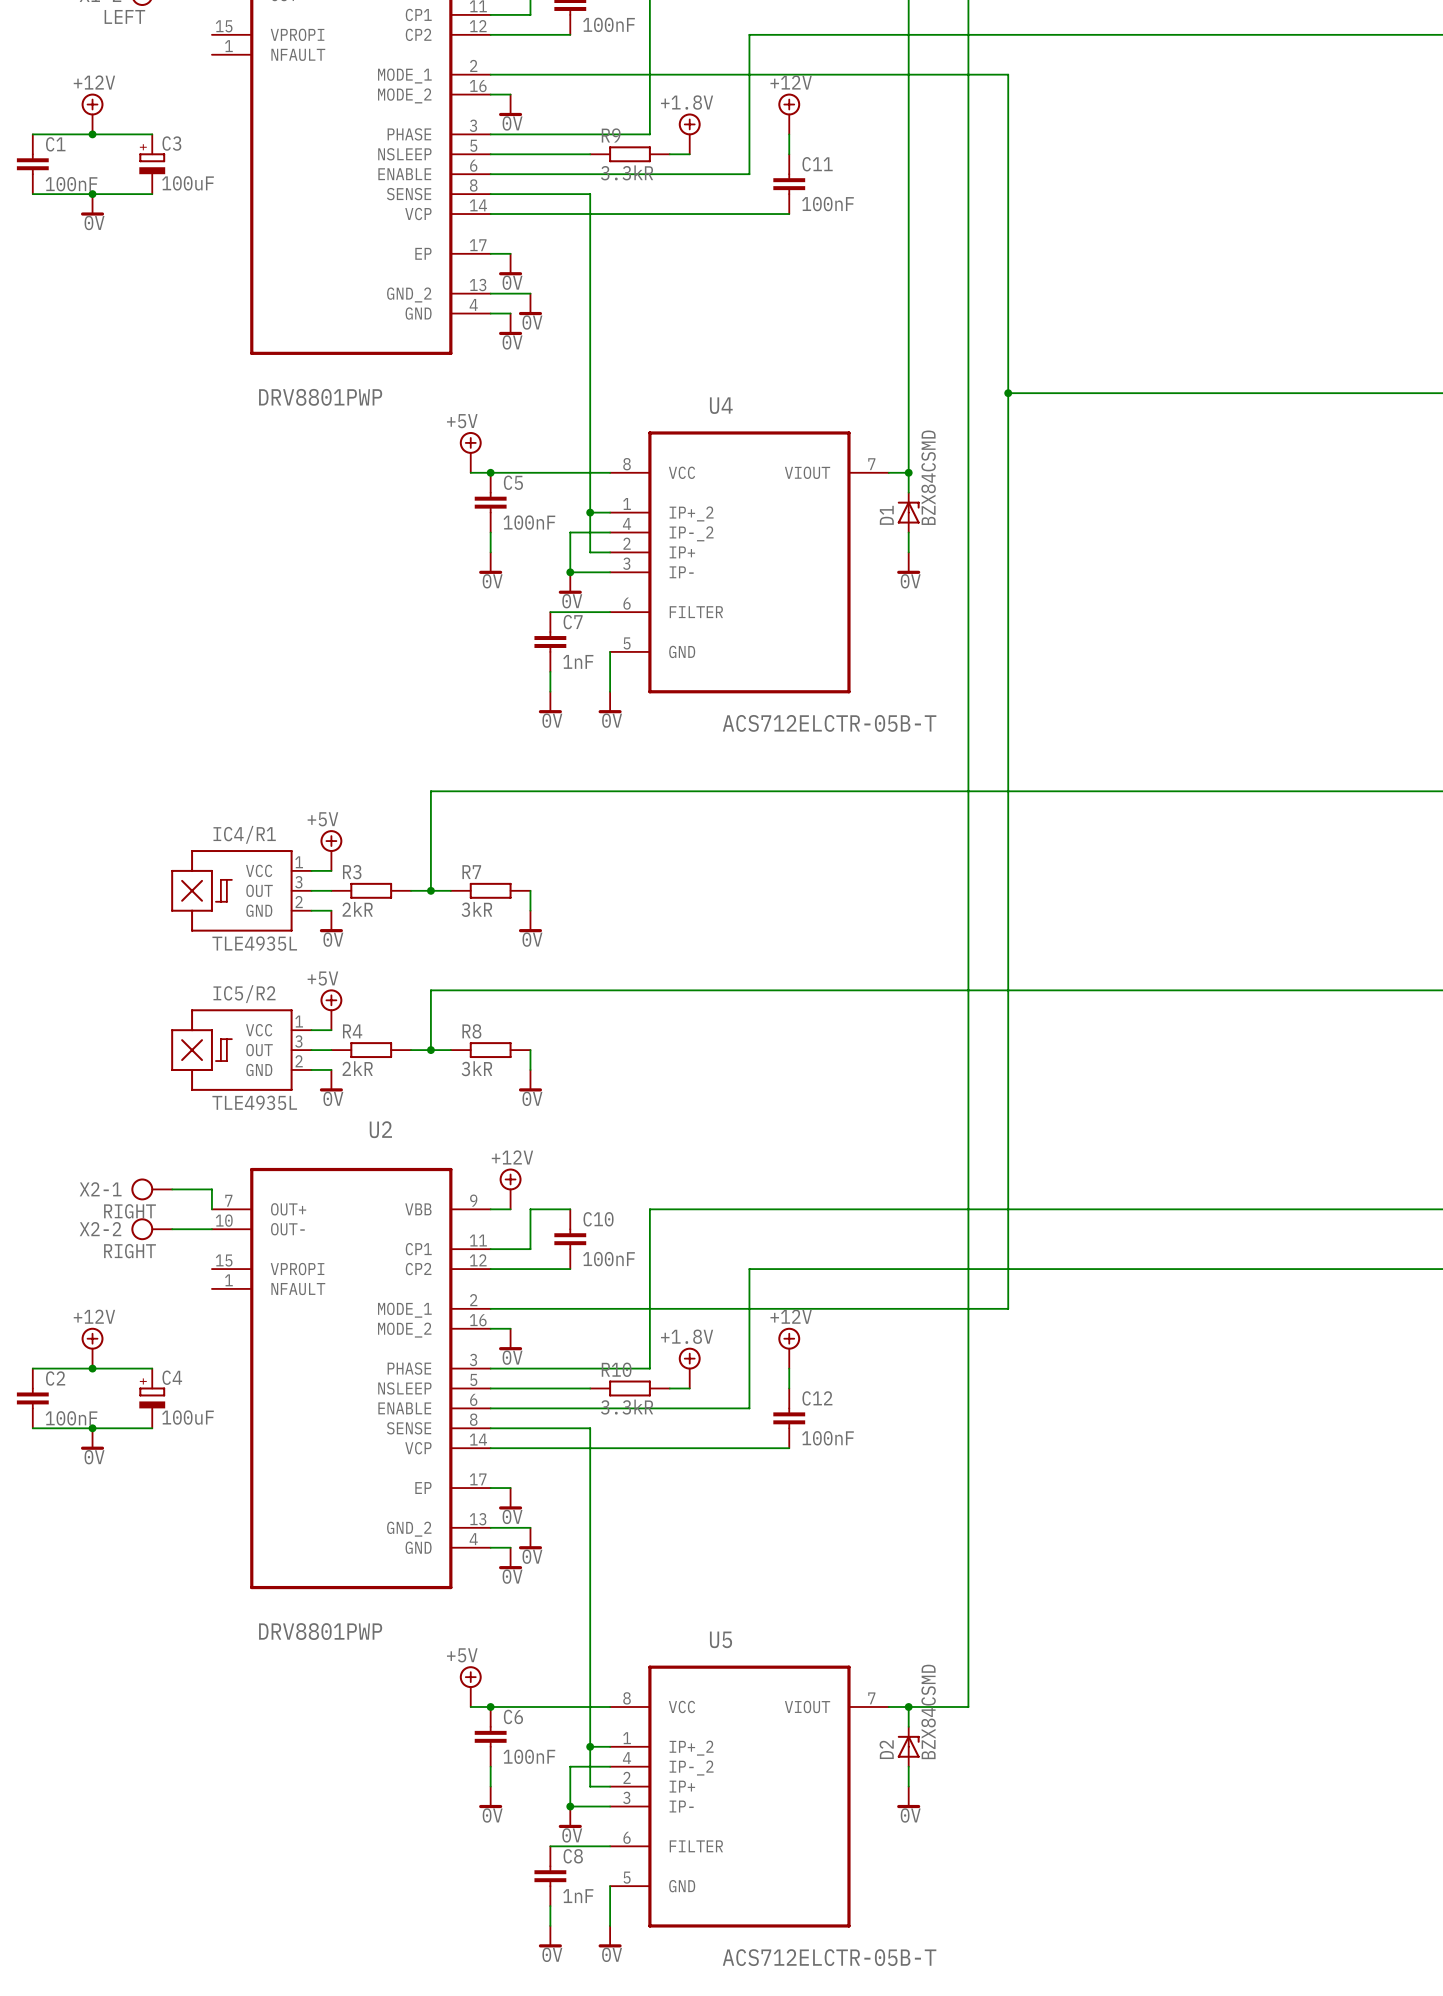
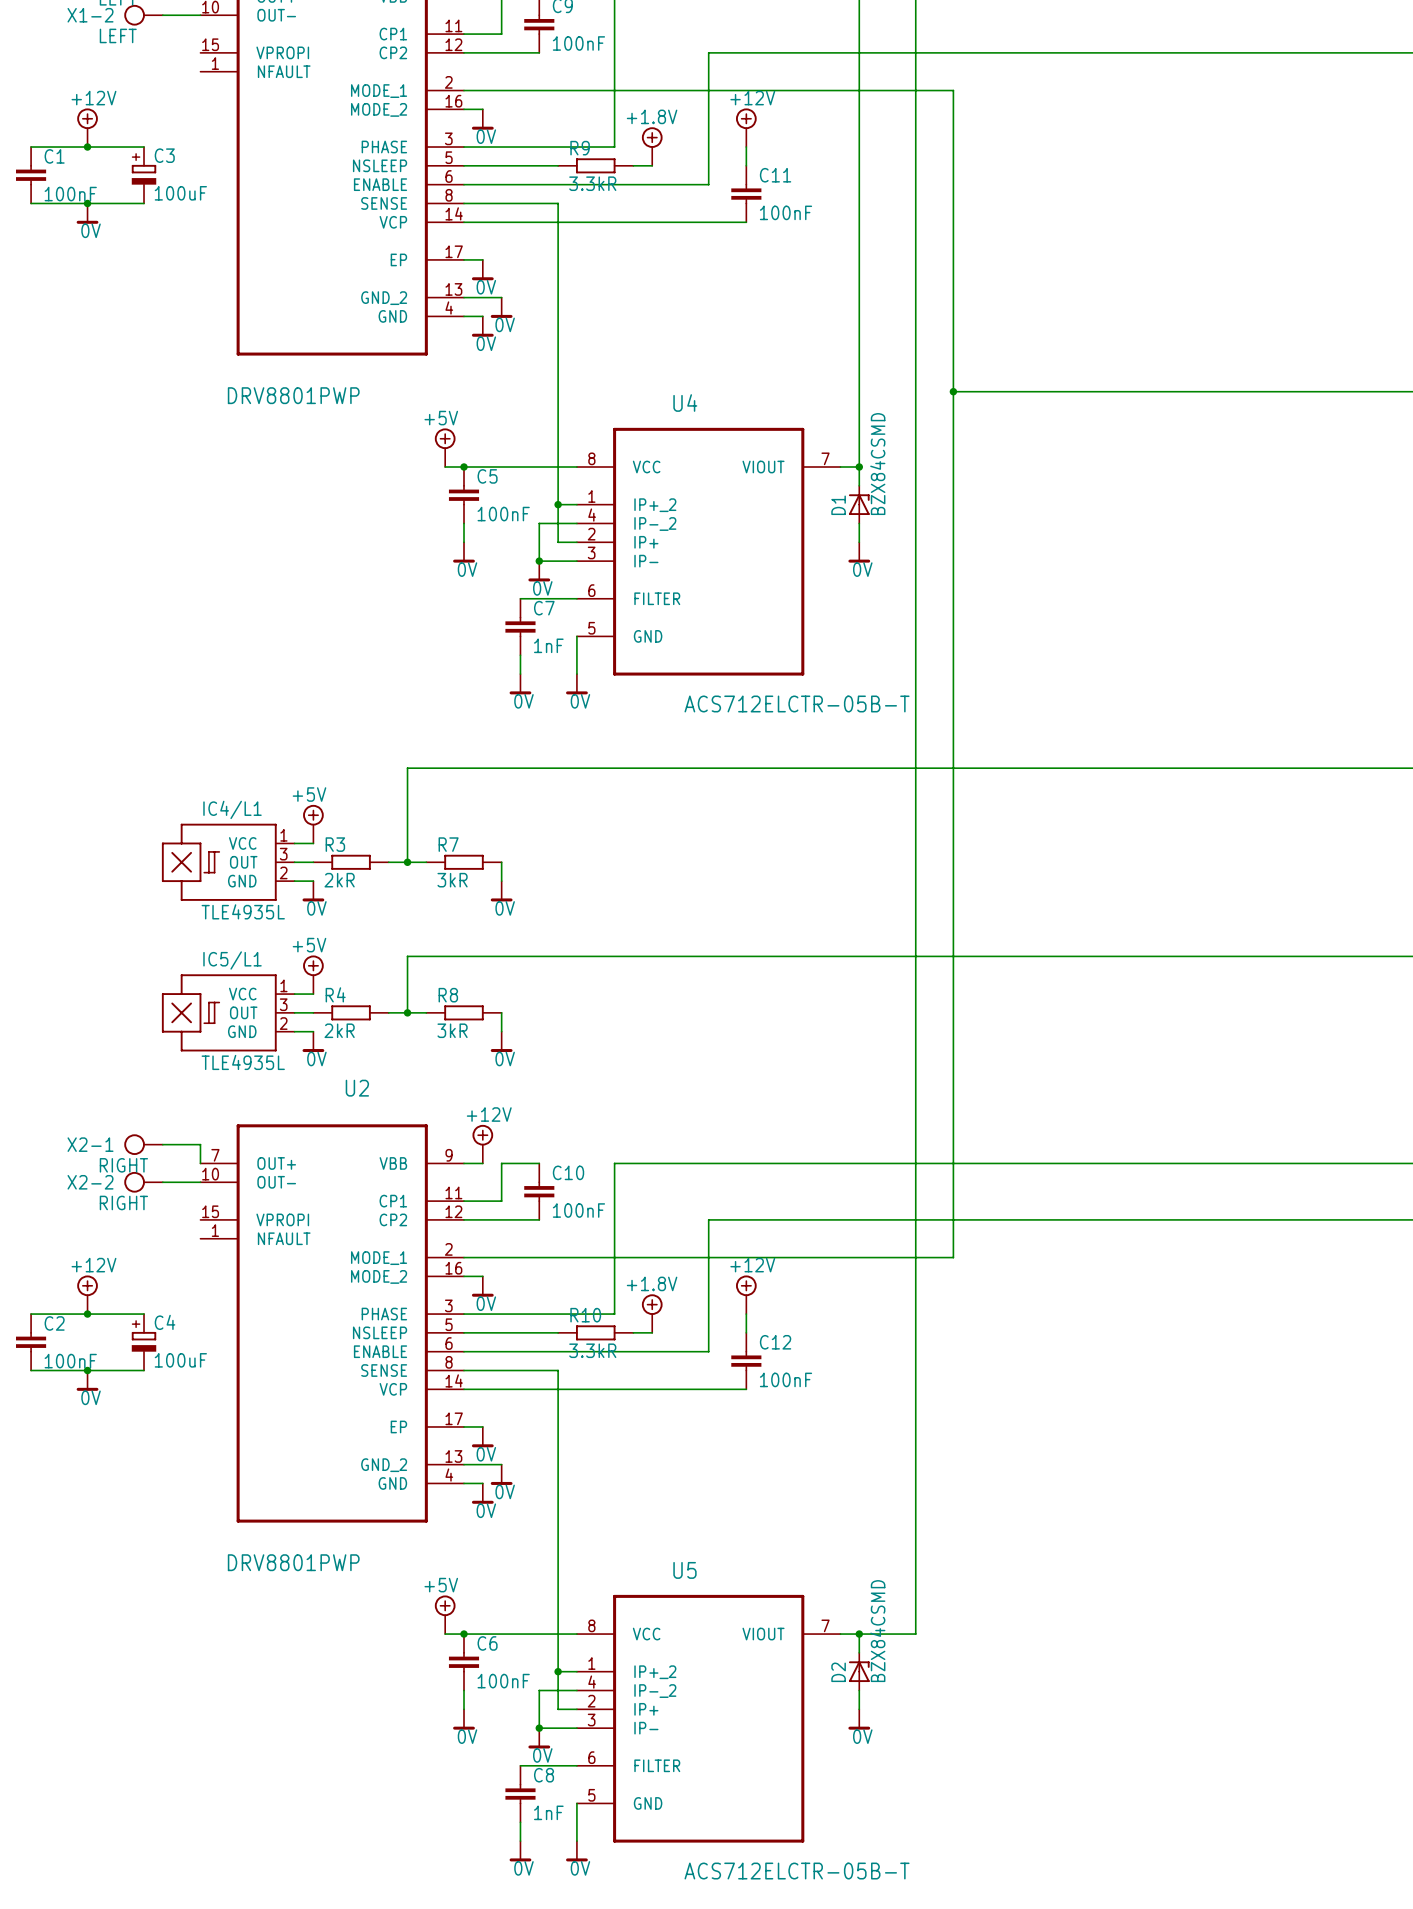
IC4/R1 name: IC4/R1 (244, 834) -> IC4/L1 (232, 809)
IC5/R2 name: IC5/R2 (244, 994) -> IC5/L1 (232, 960)

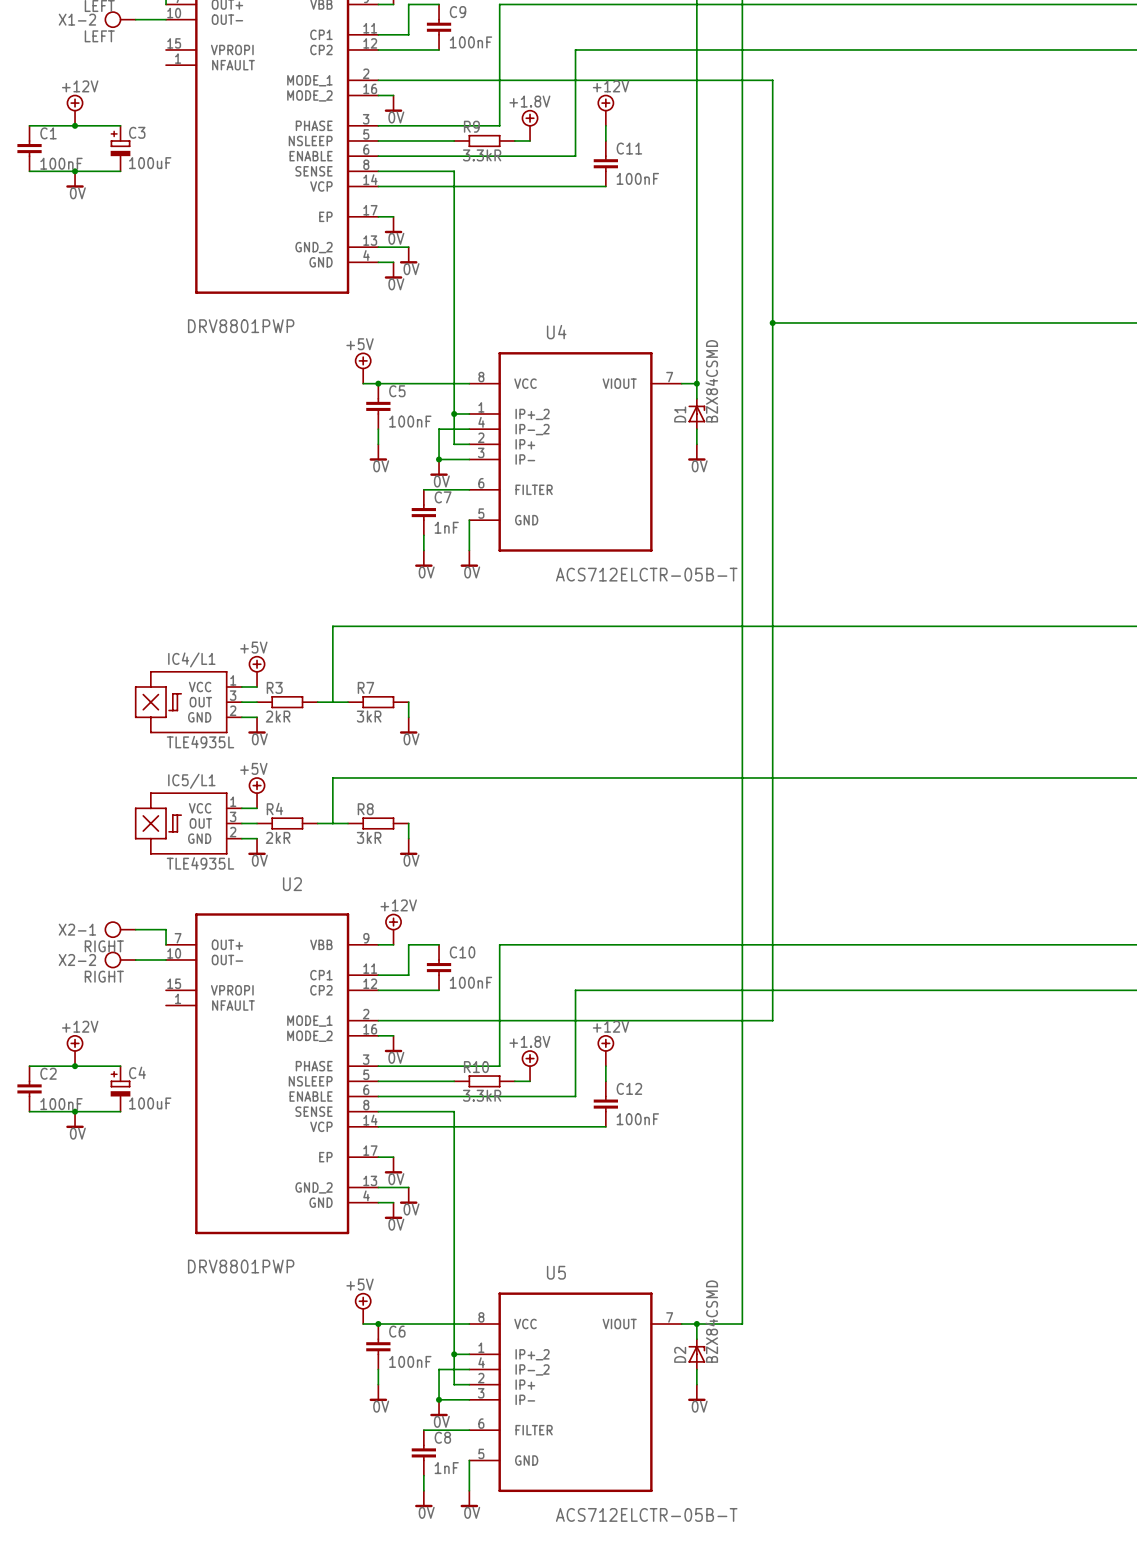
junction: (407, 862) -> none
junction: (407, 1012) -> none

